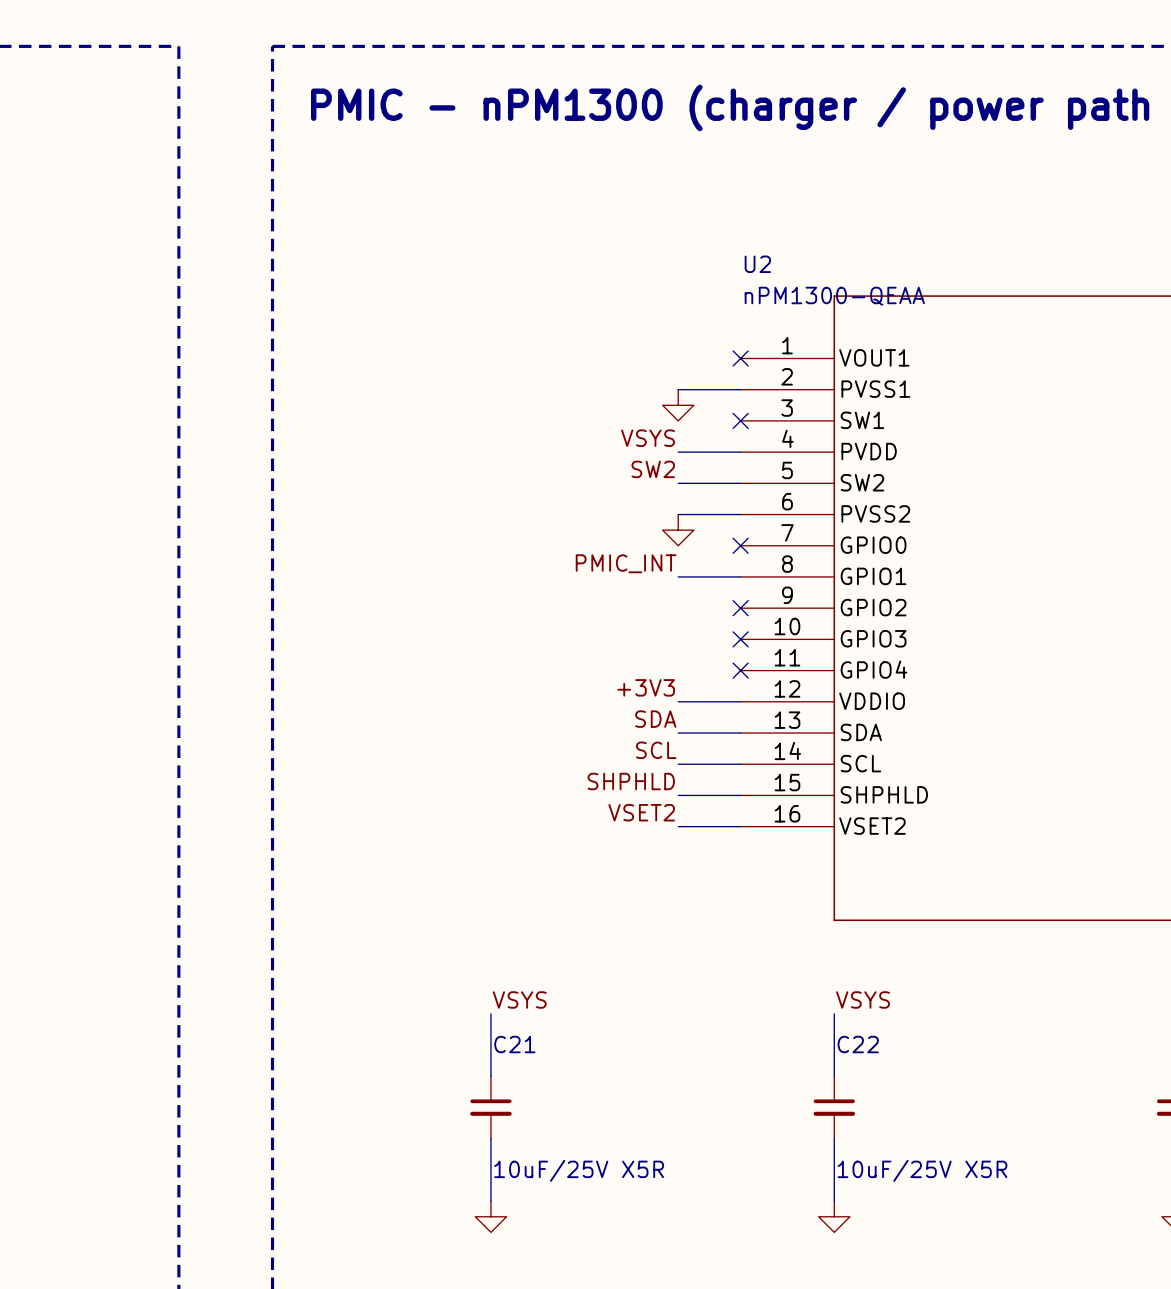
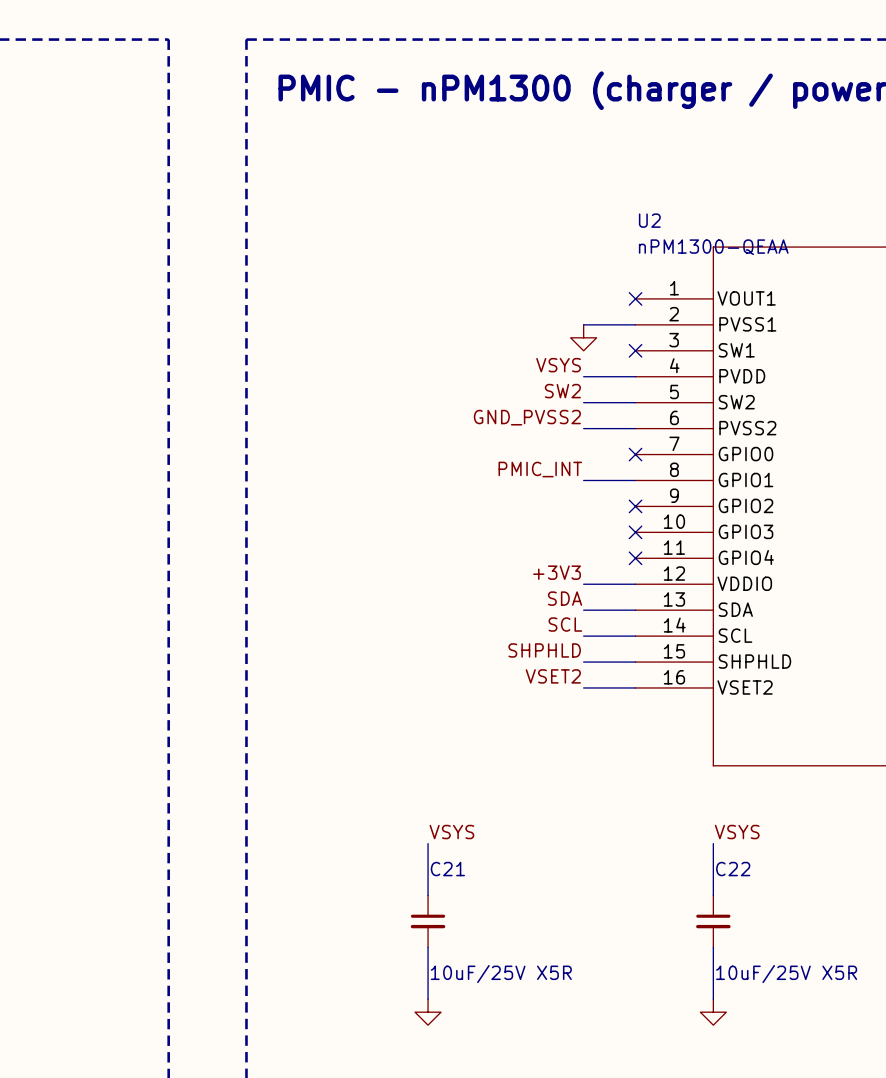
label: none -> GND_PVSS2 (527, 417)
power symbol: (678, 530) -> none

